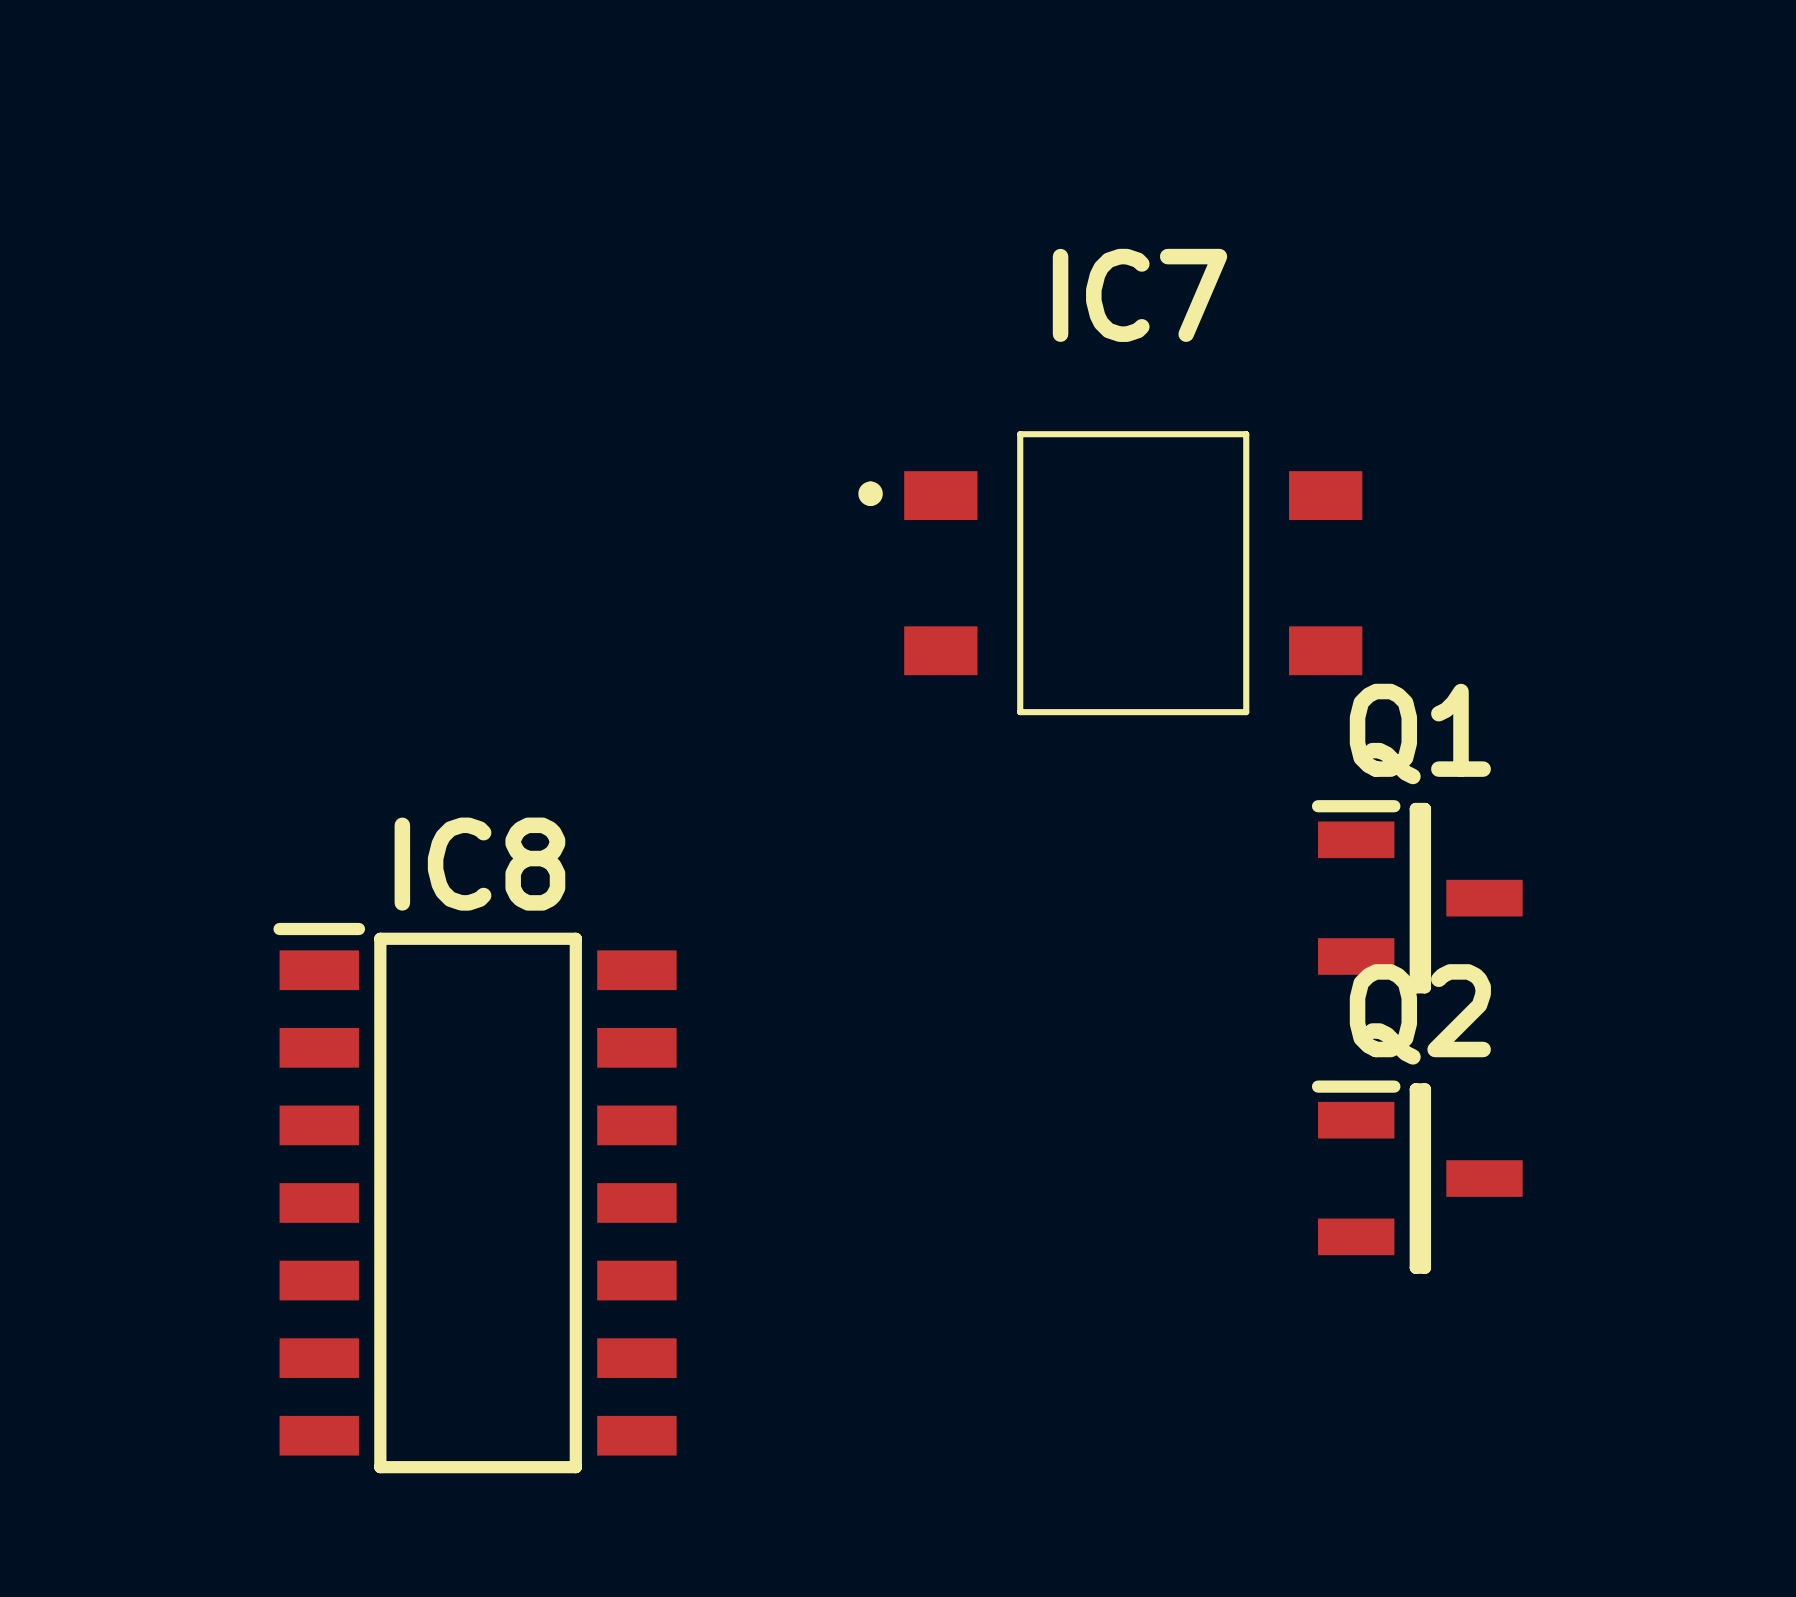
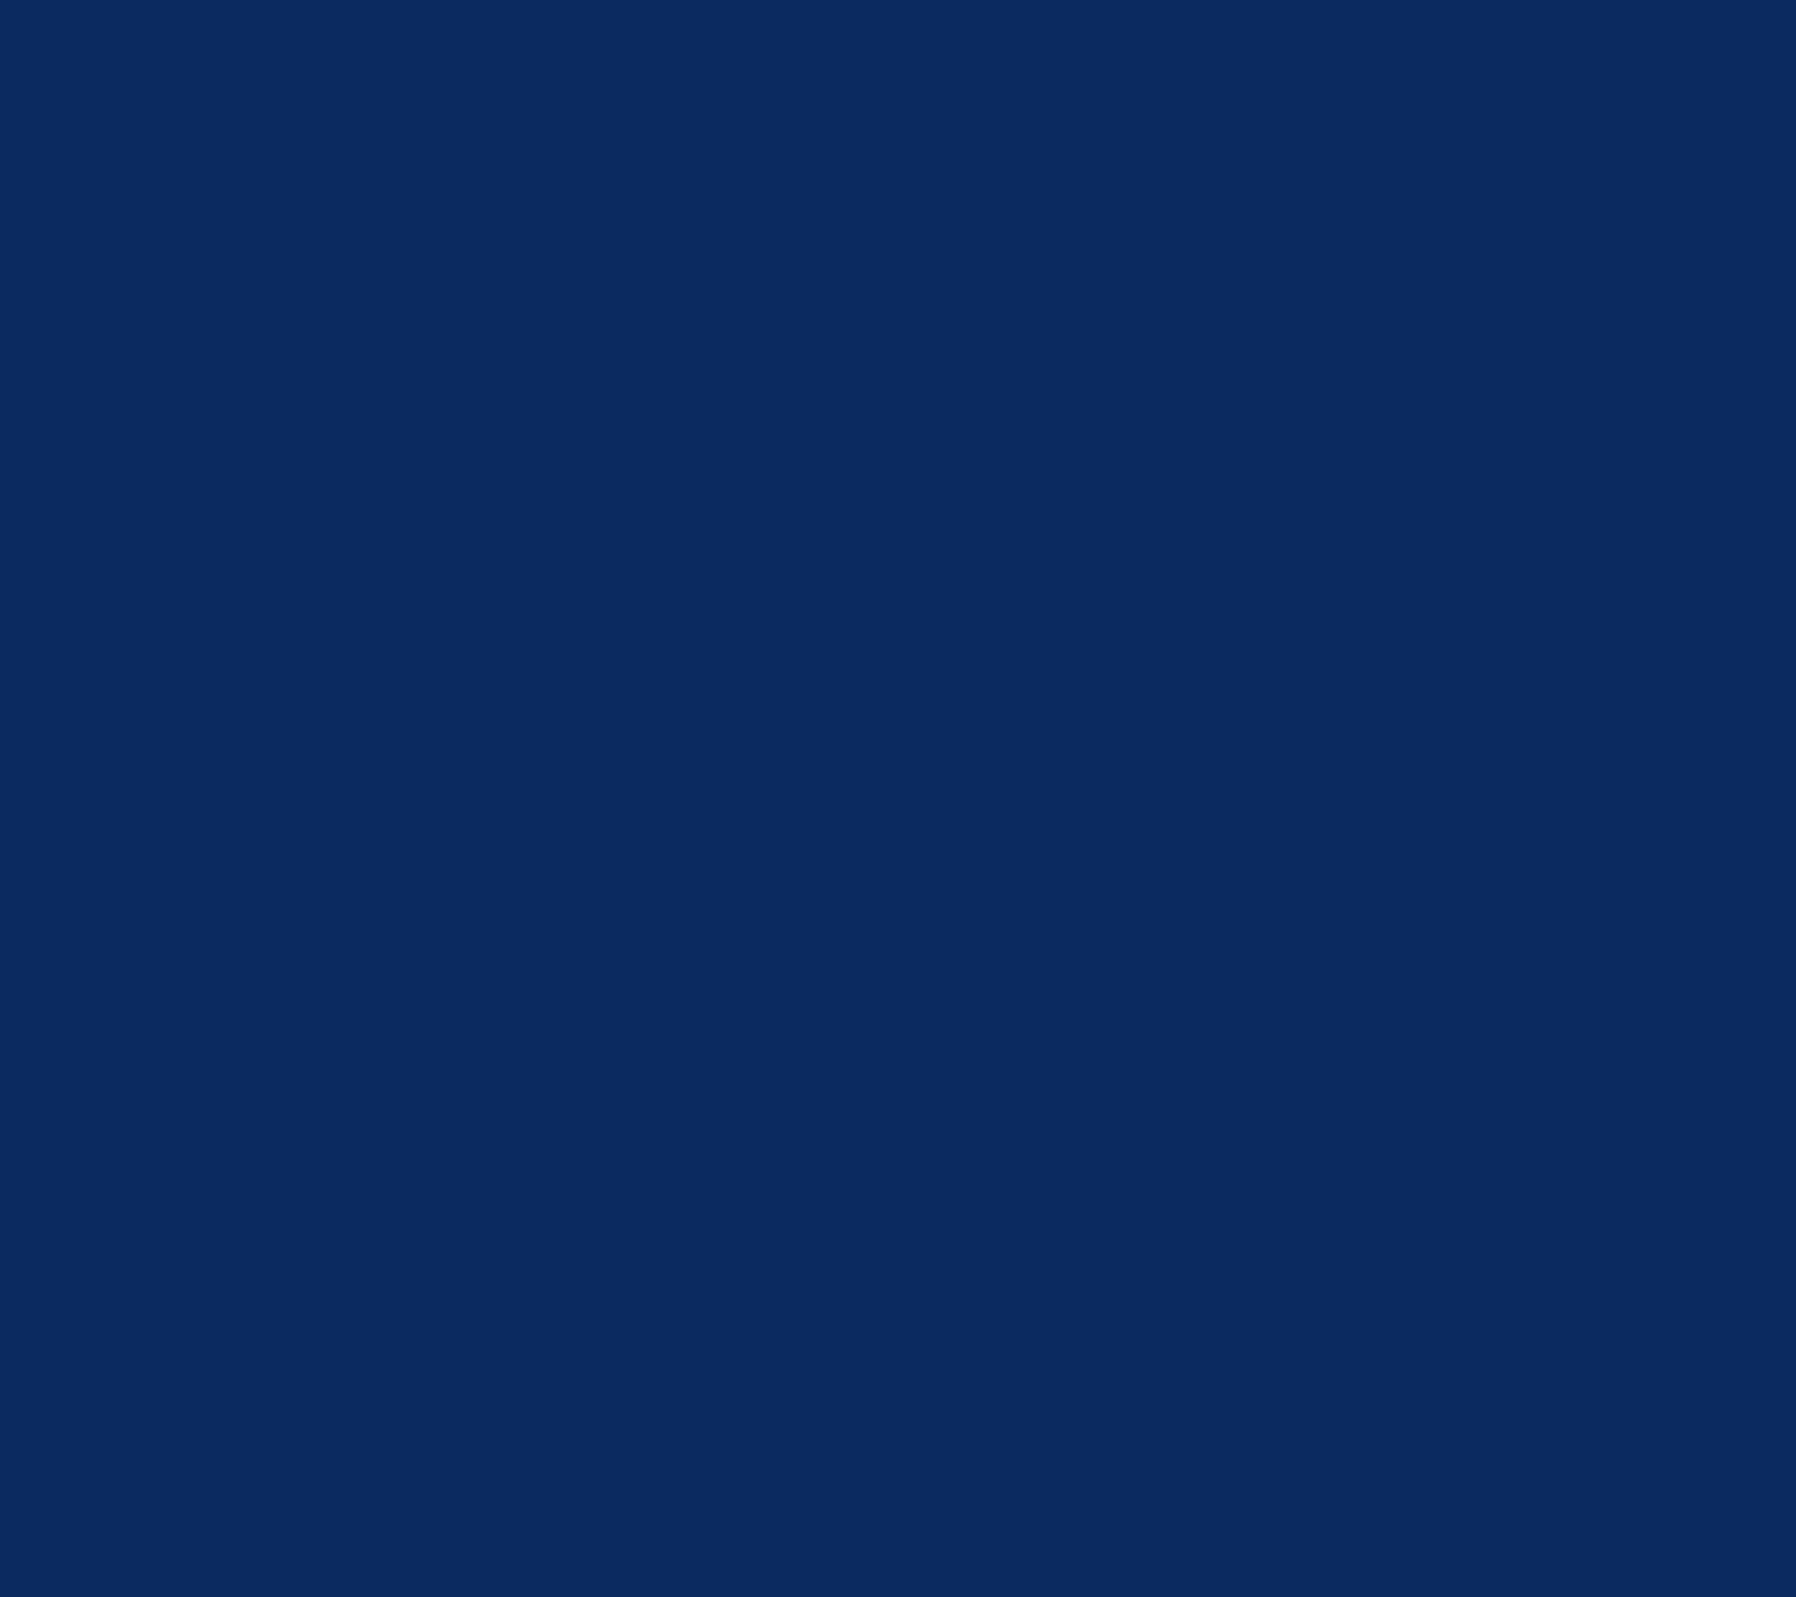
IC7: (1110, 573) -> none
Q1: (1417, 896) -> none
Q2: (1417, 1177) -> none
IC8: (475, 1198) -> none

